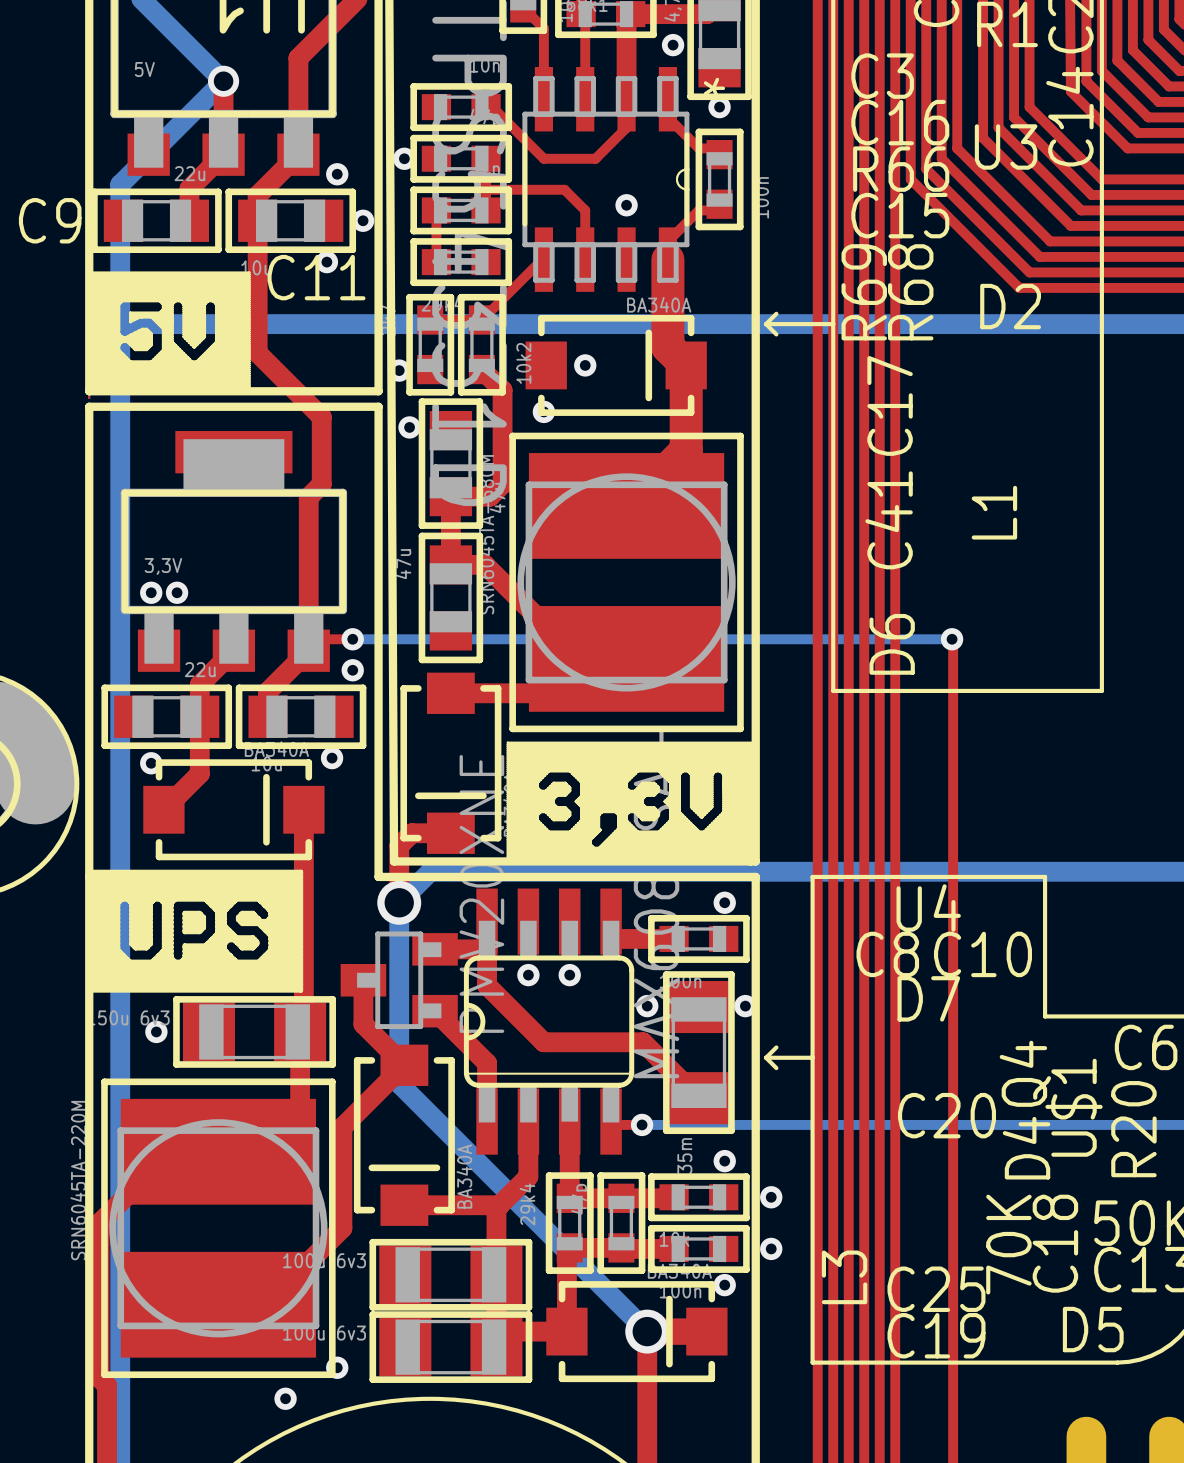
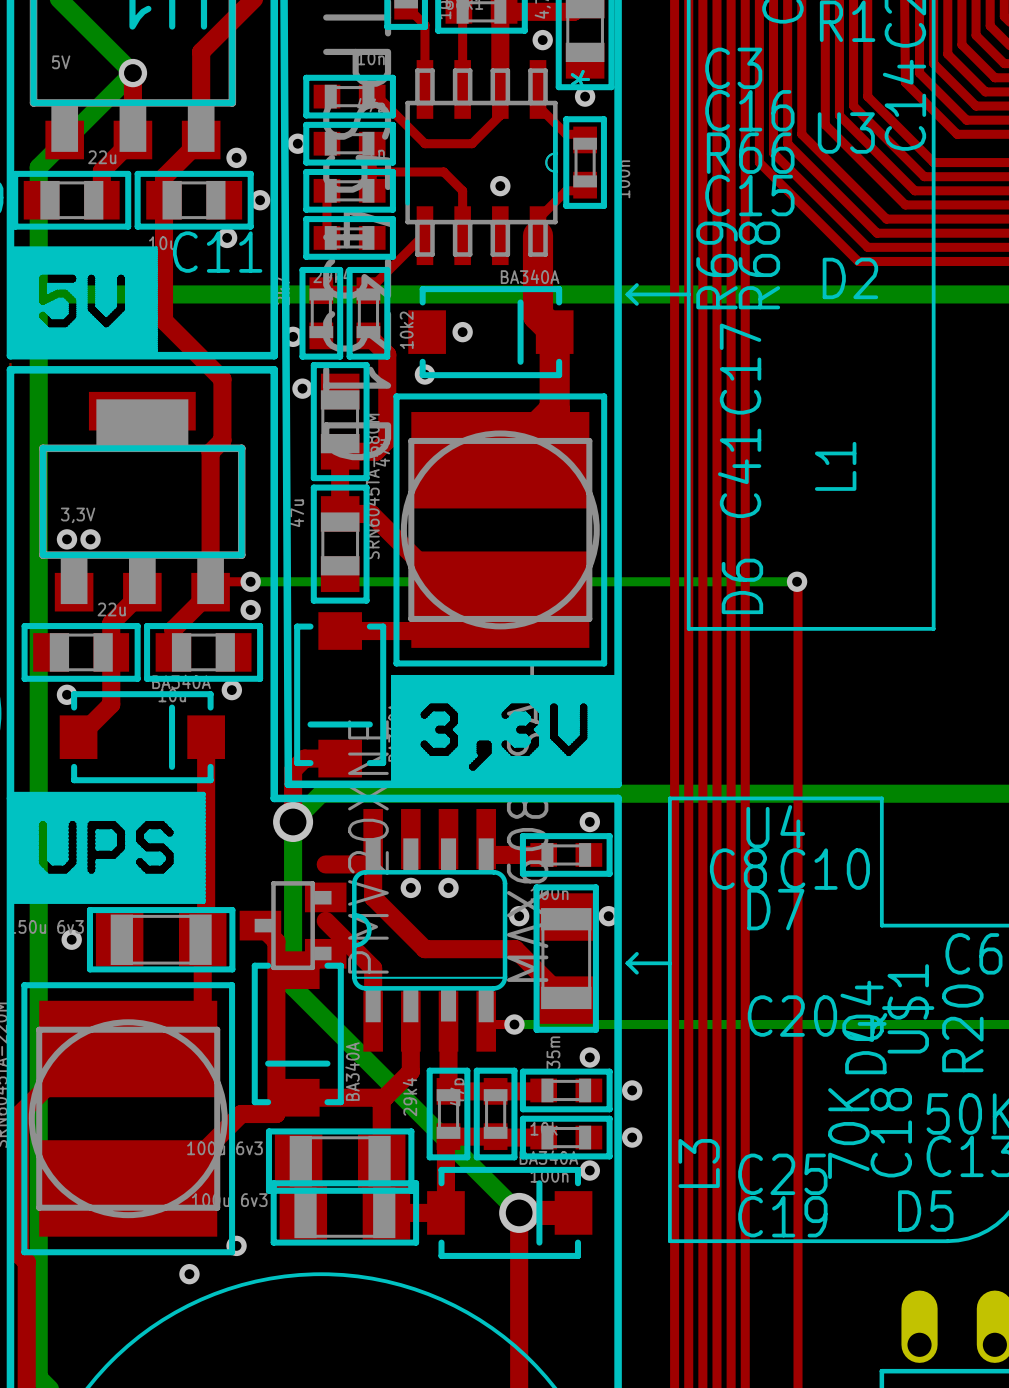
top track: (363, 980) (363, 1024) (404, 1065) (342, 1127) (342, 1228) (265, 1304) (260, 1304) -> (260, 925) (276, 941) (276, 1114) (241, 1114) (166, 1188)
Q4 position: (399, 980) -> (293, 925)
C19 position: (450, 1347) -> (344, 1212)

